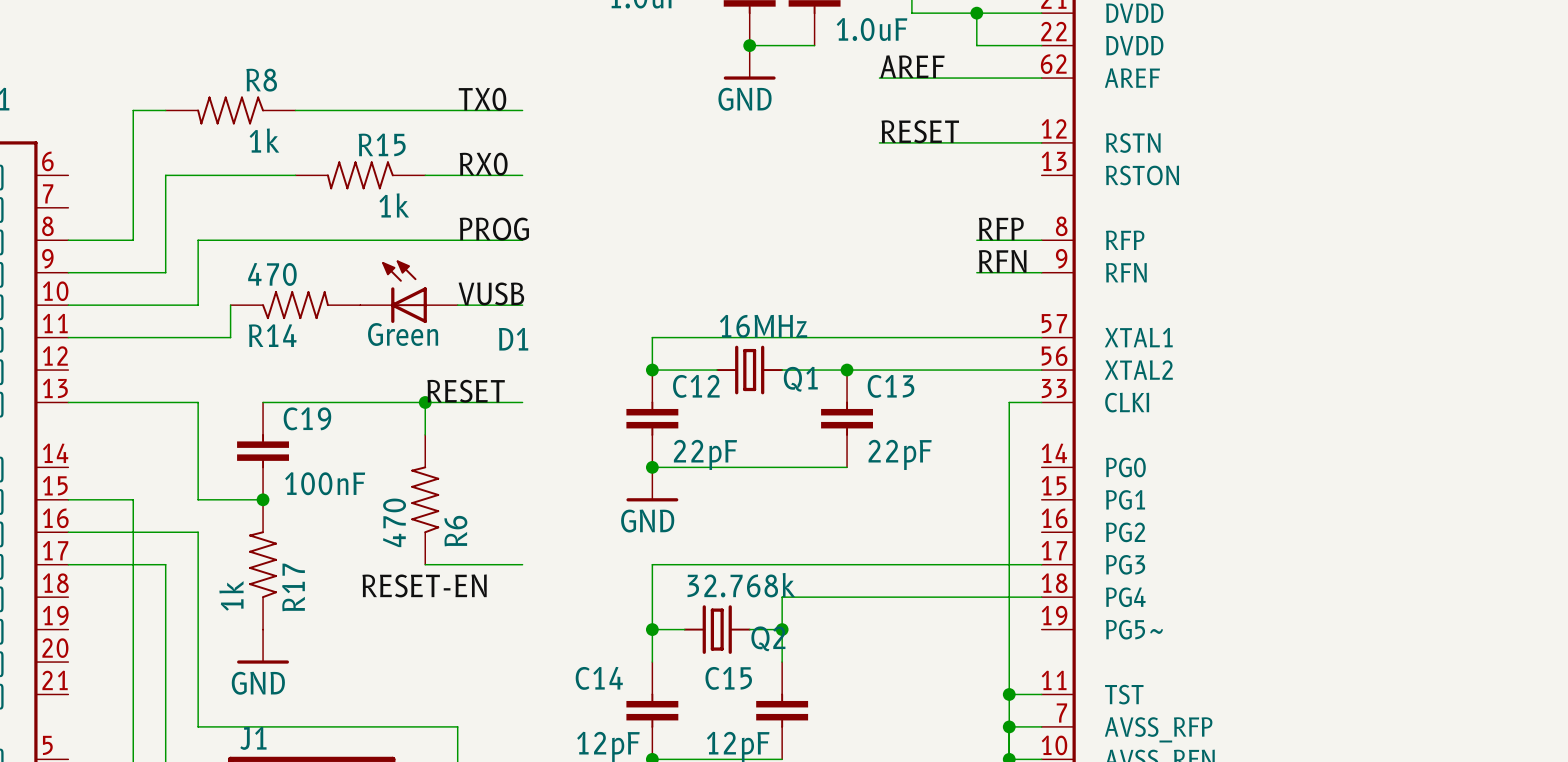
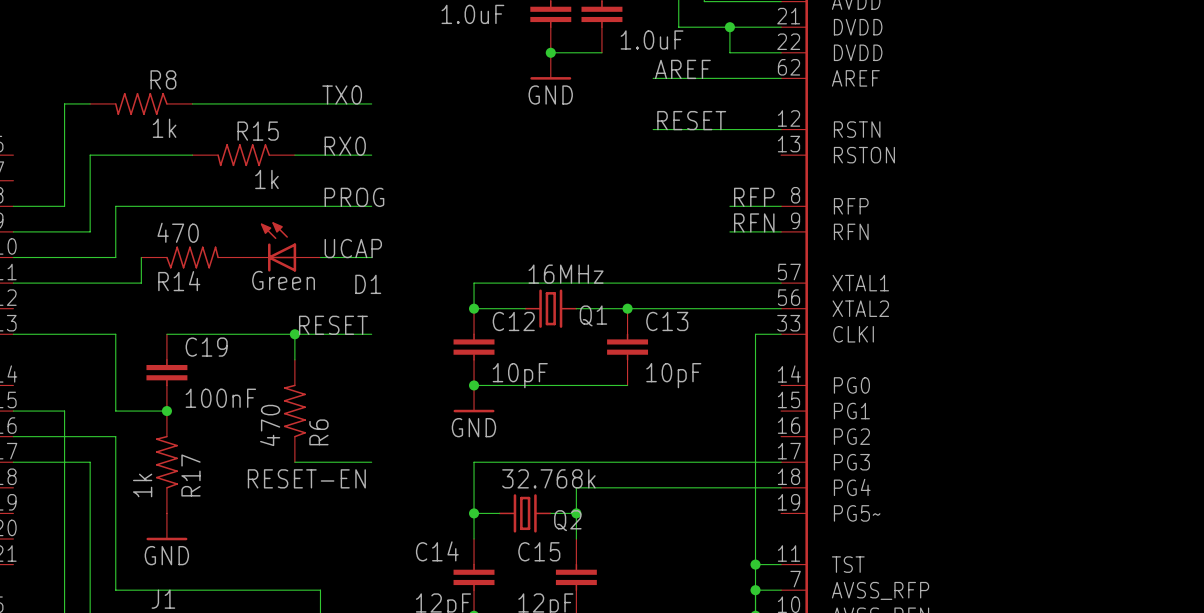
label: VUSB (491, 293) -> UCAP (353, 248)
C12 value: 22pF (705, 454) -> 10pF (520, 375)
C13 value: 22pF (900, 454) -> 10pF (673, 375)

